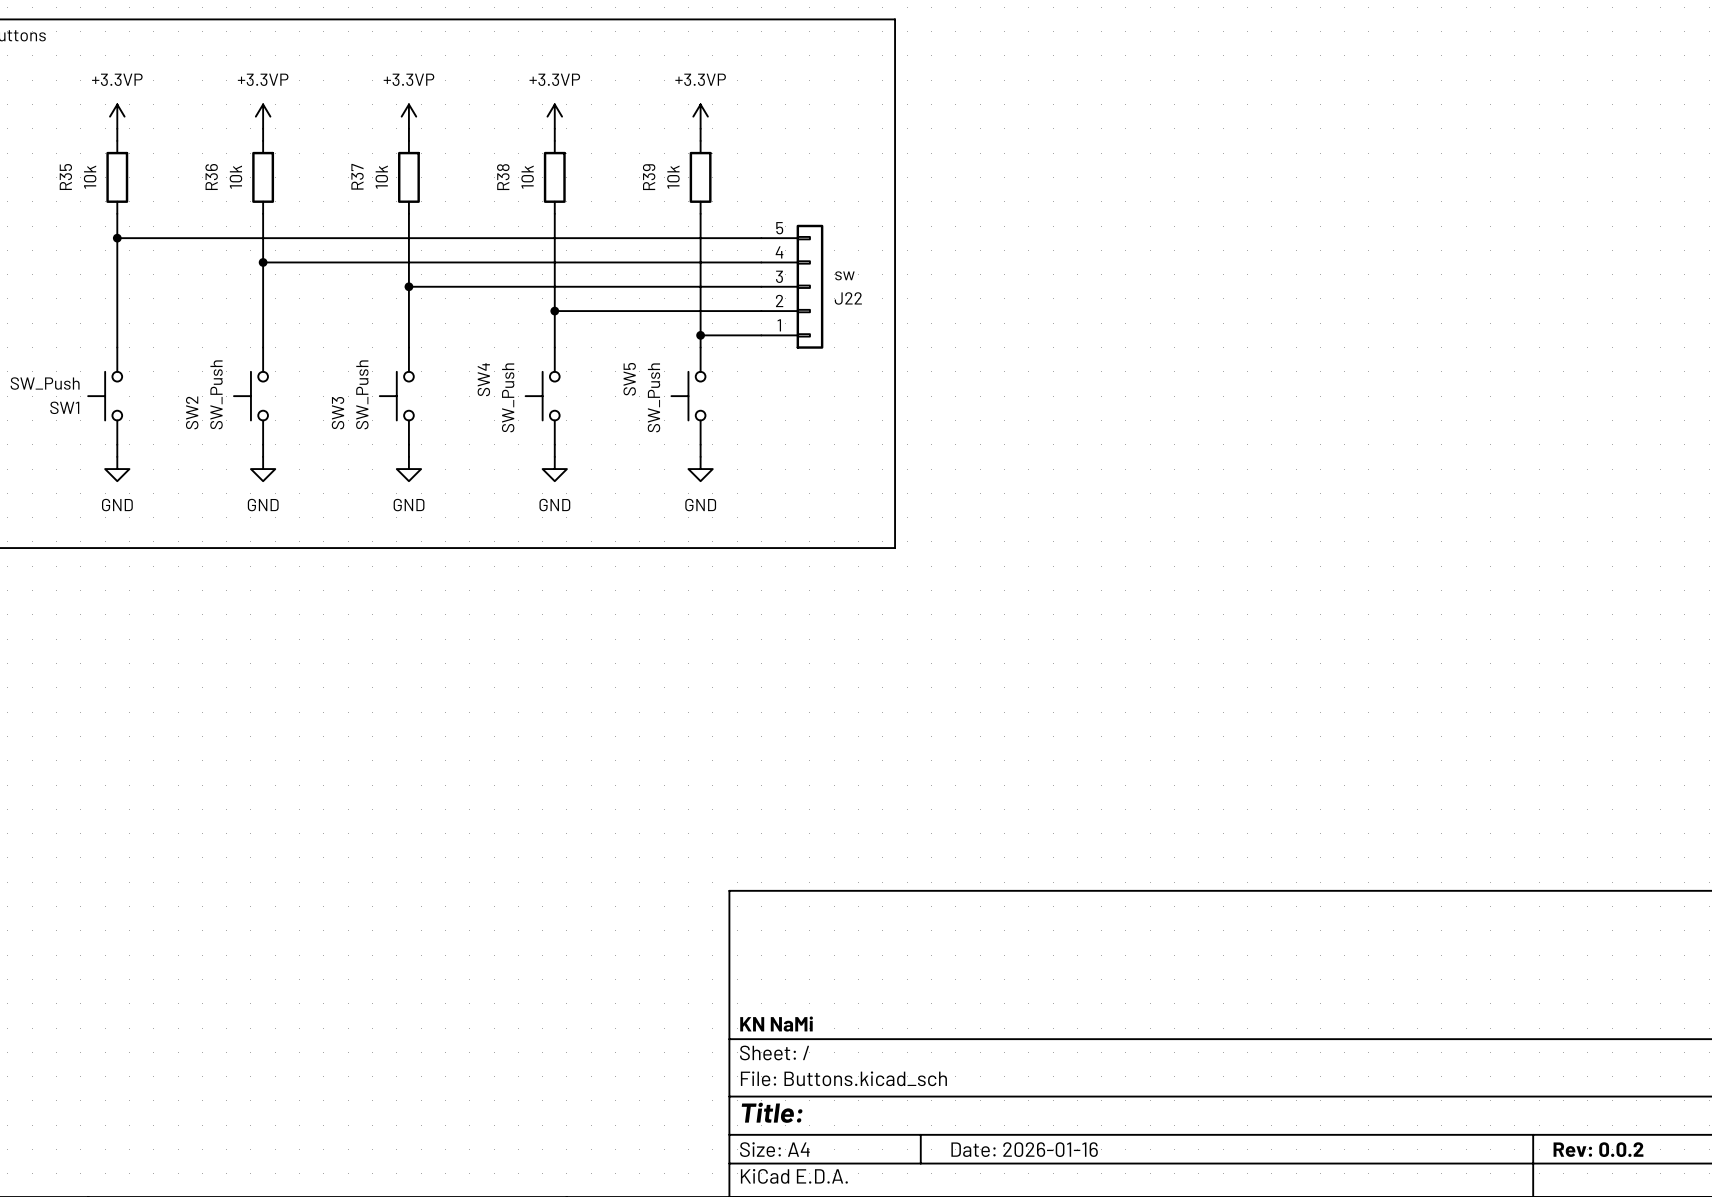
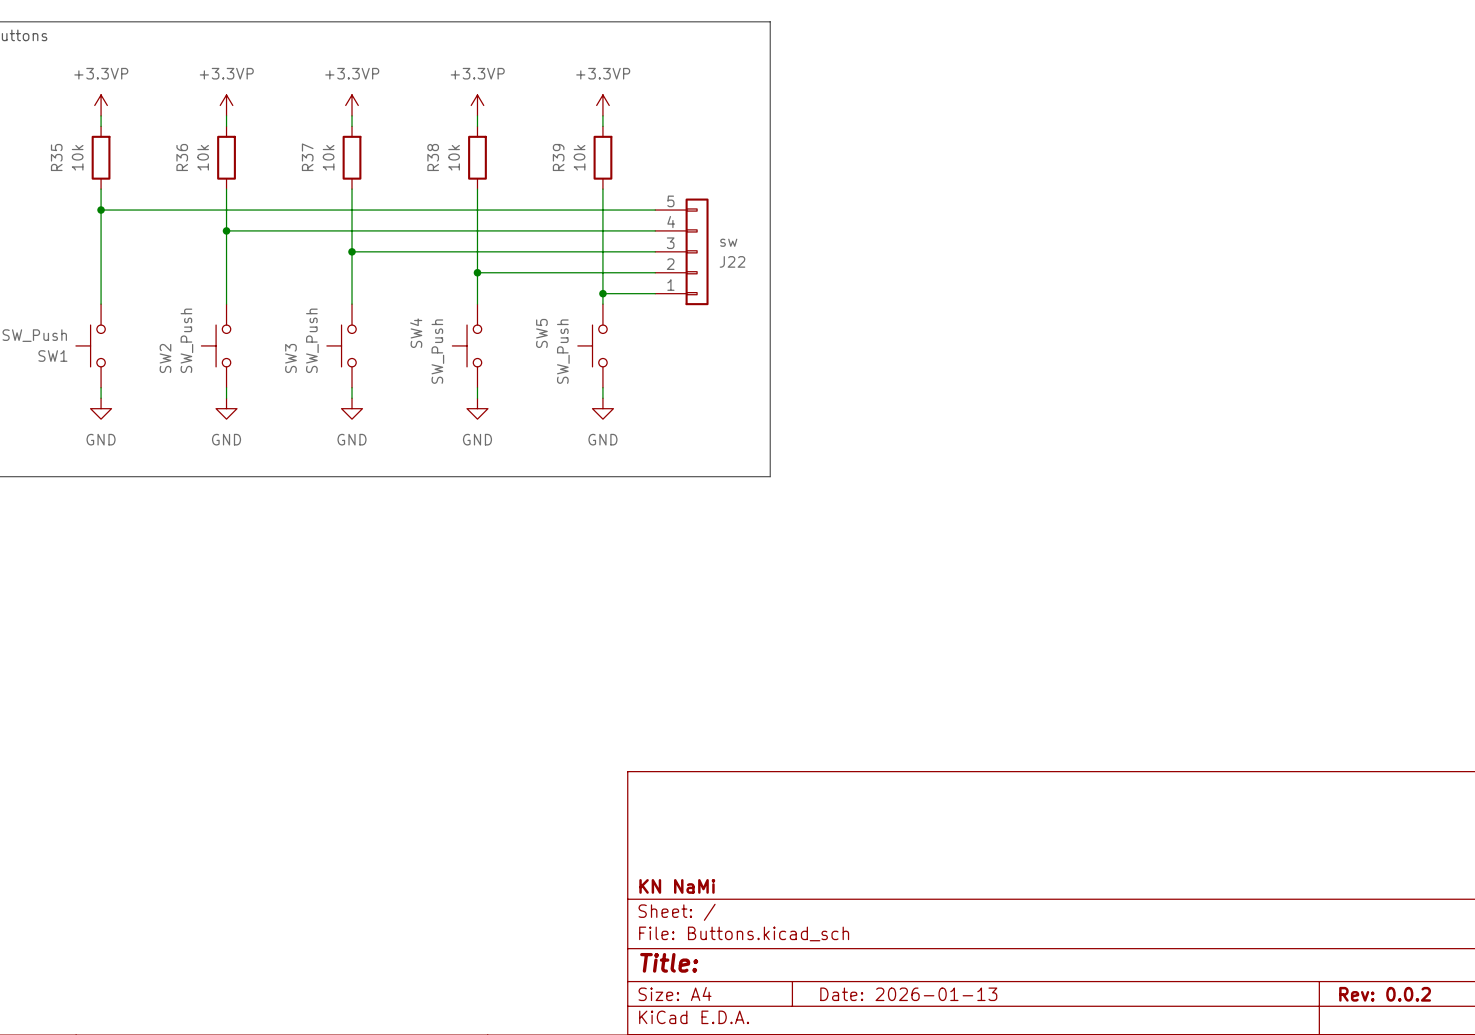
title block: Date: 2026-01-16 (1024, 1149) -> Date: 2026-01-13 (908, 994)

